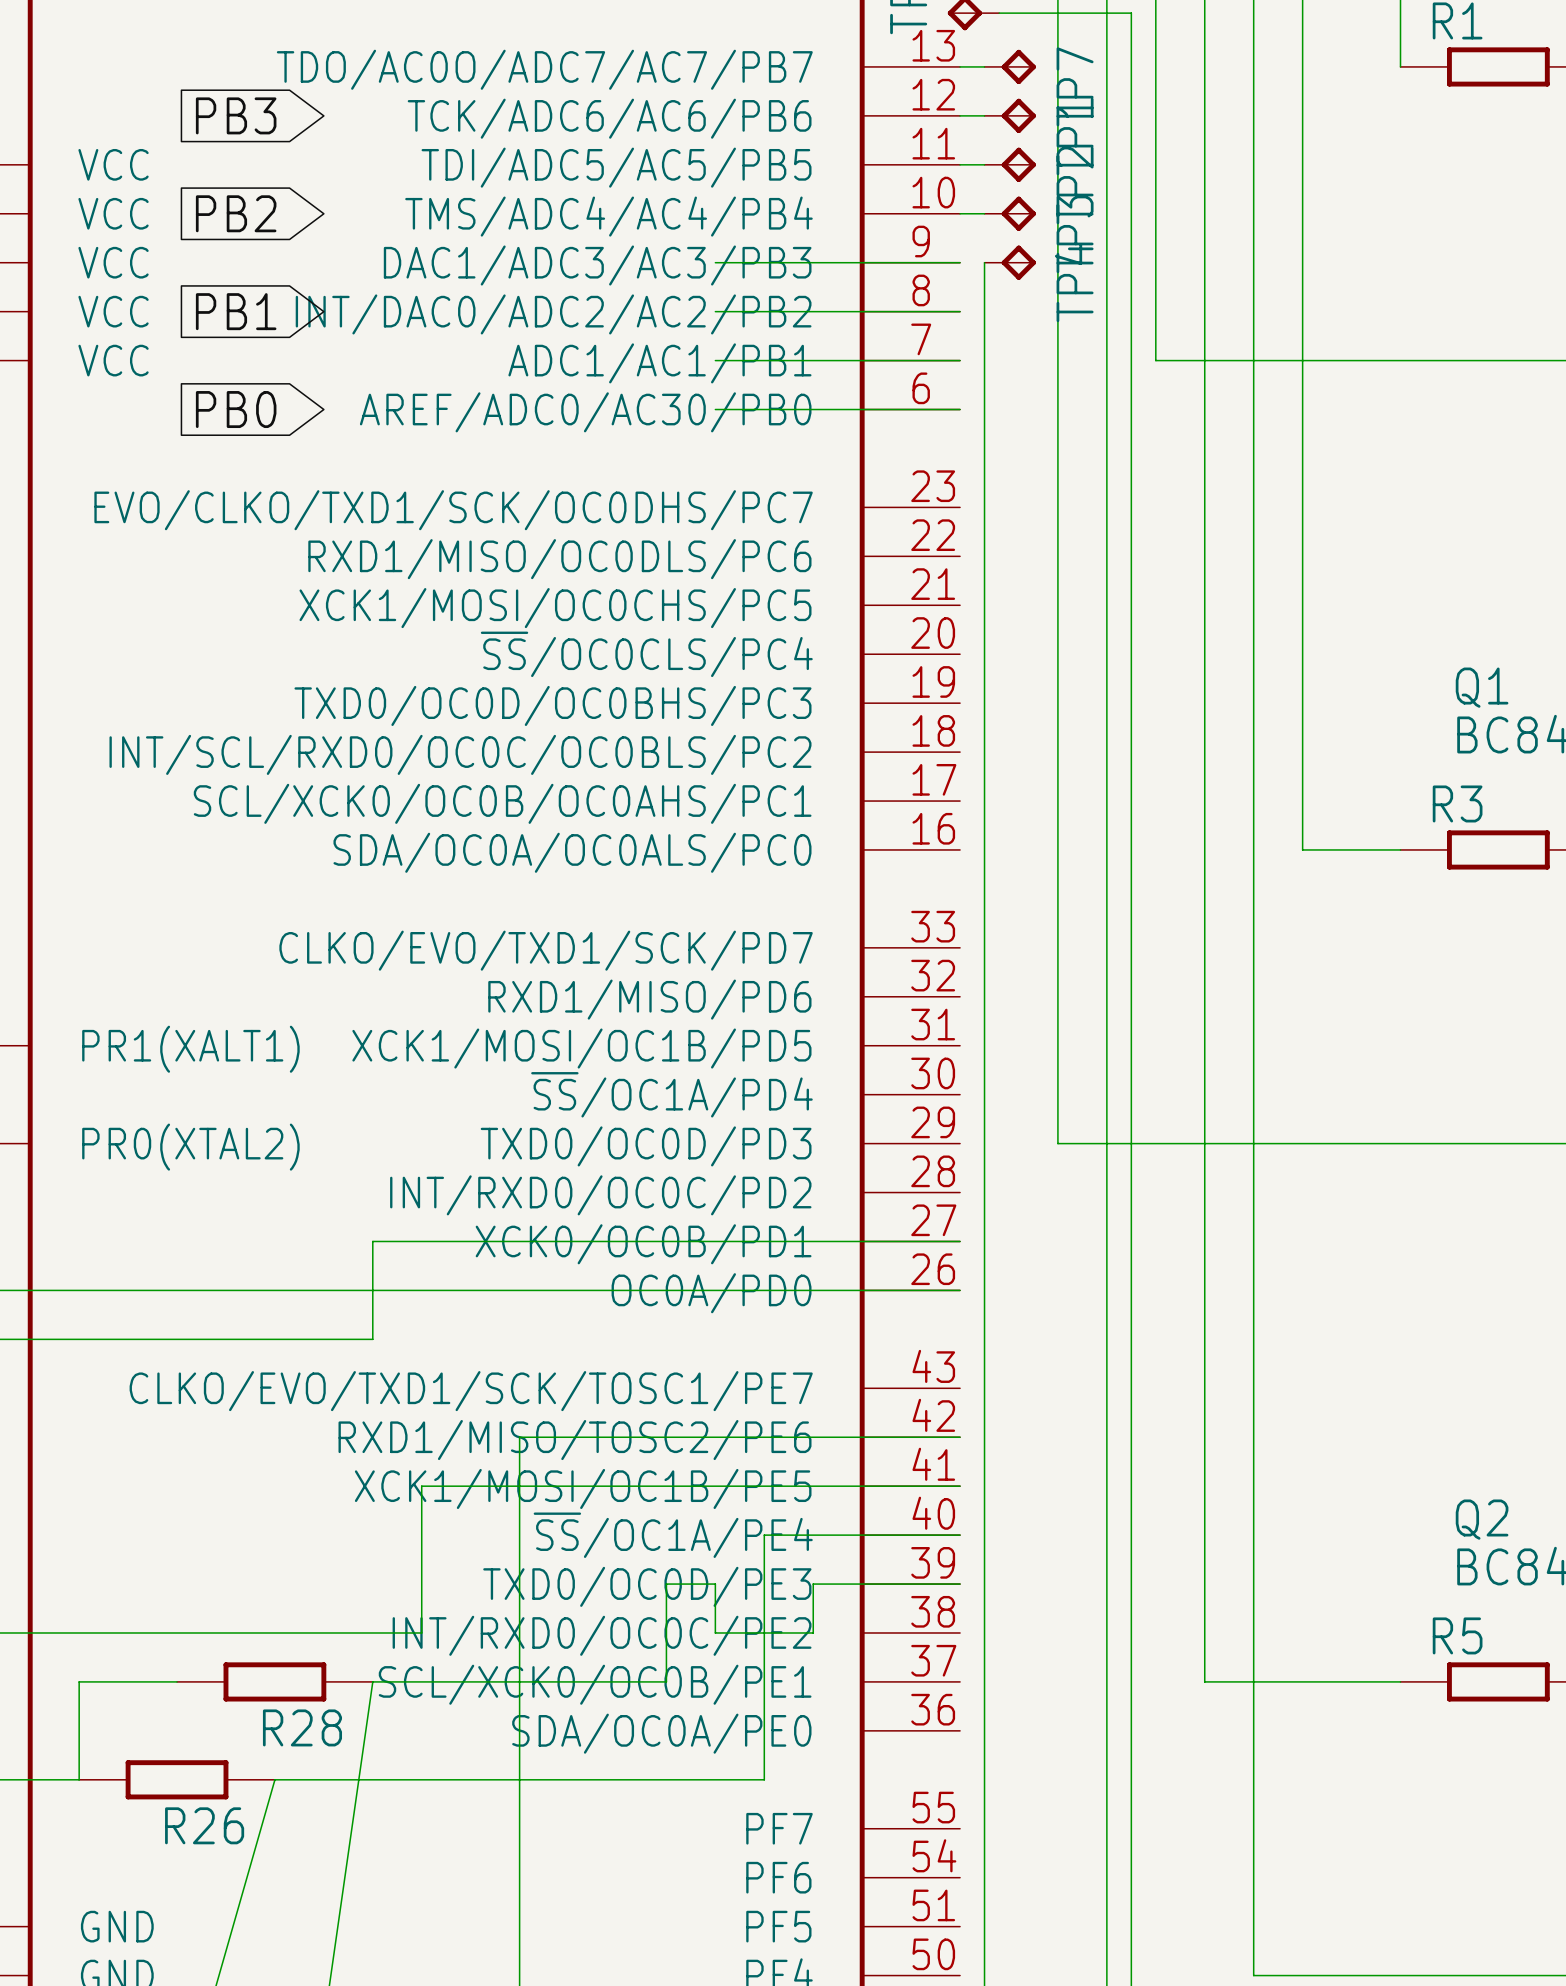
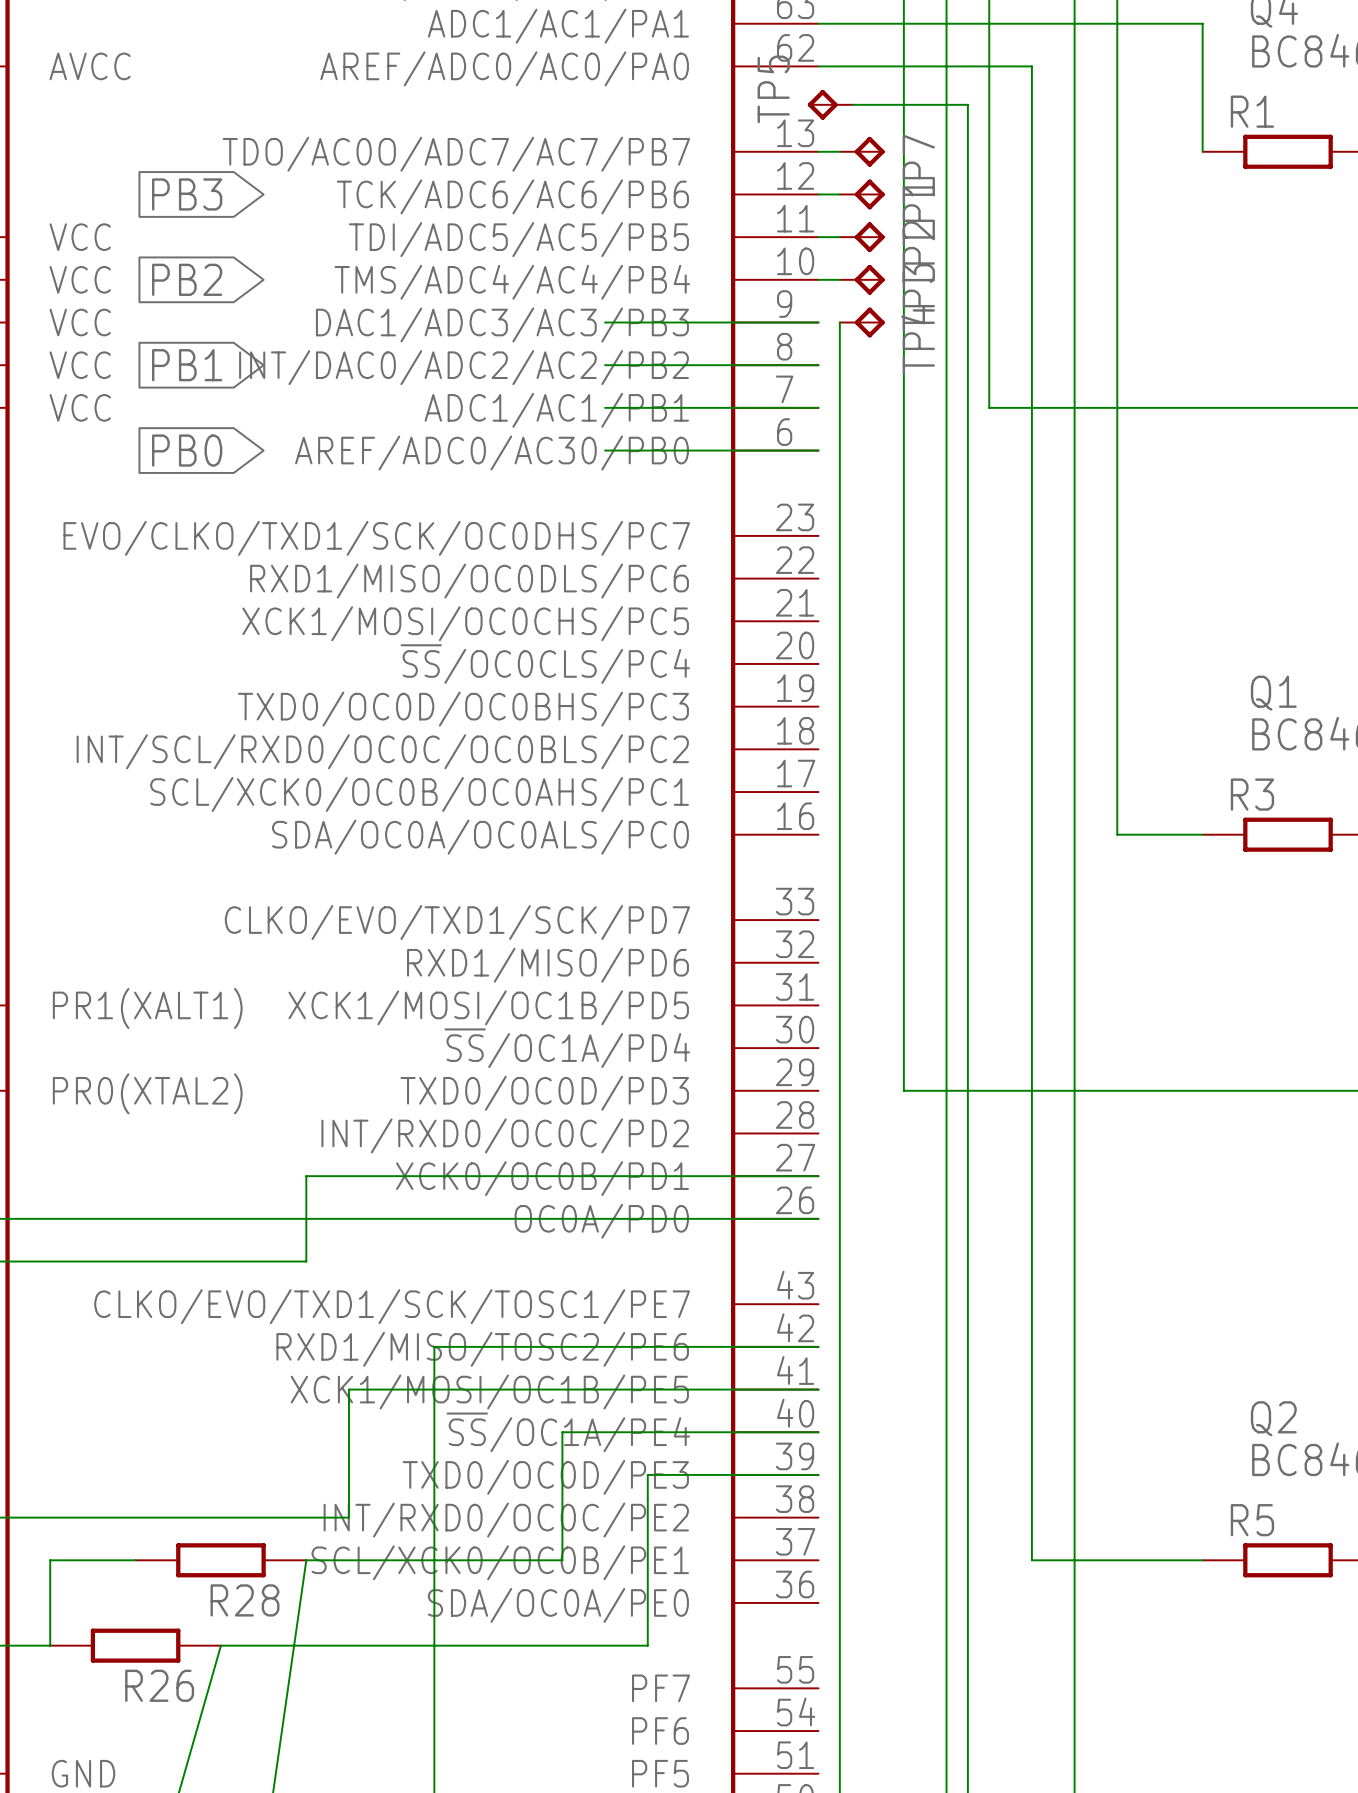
wire: (764, 1535) (764, 1584) -> (690, 1474) (647, 1474)
wire: (666, 1584) (715, 1584) (715, 1632) (813, 1632) (813, 1584) -> (562, 1474) (562, 1432) (647, 1432)

